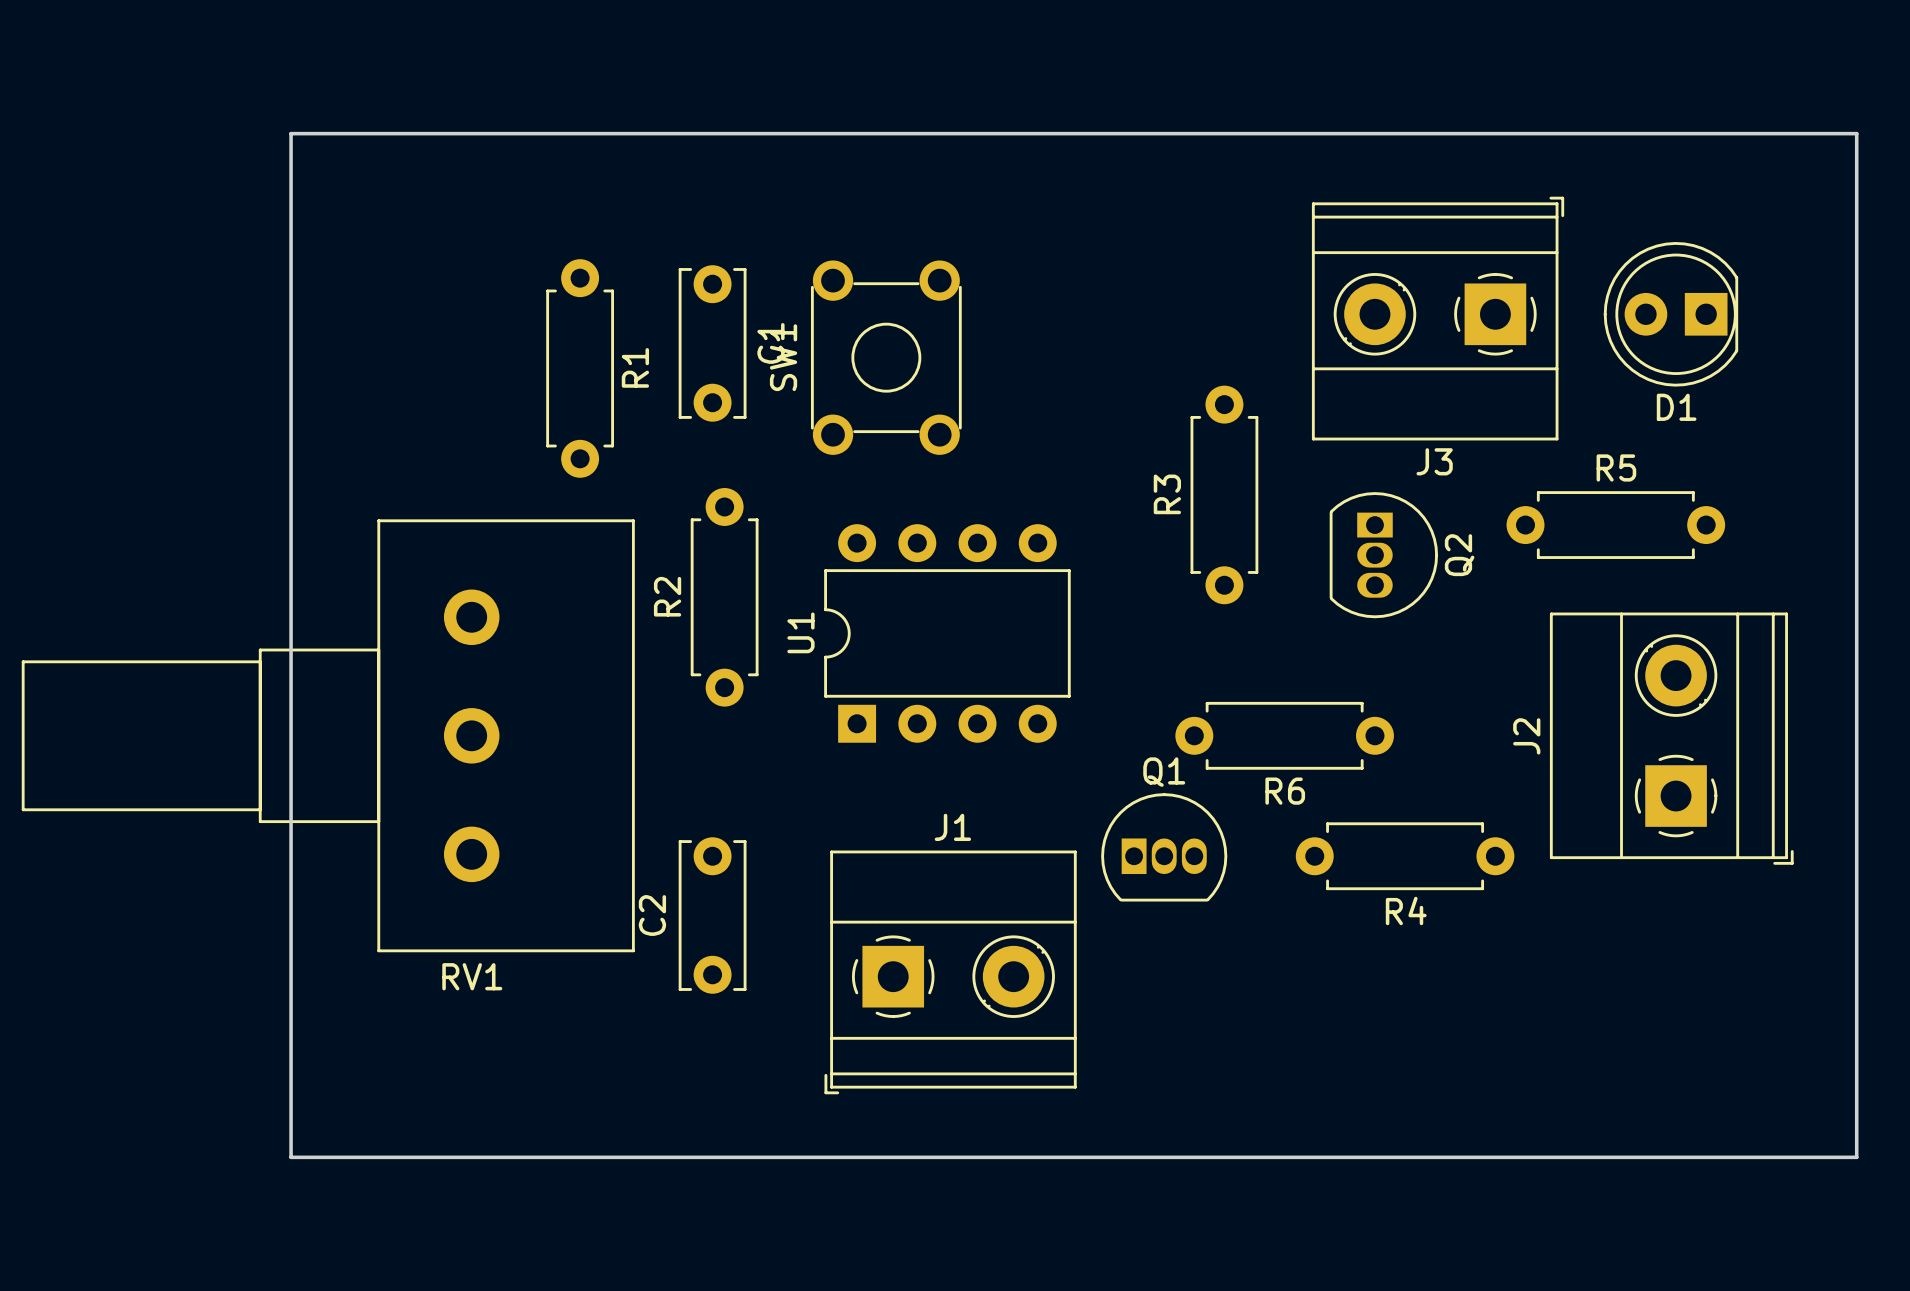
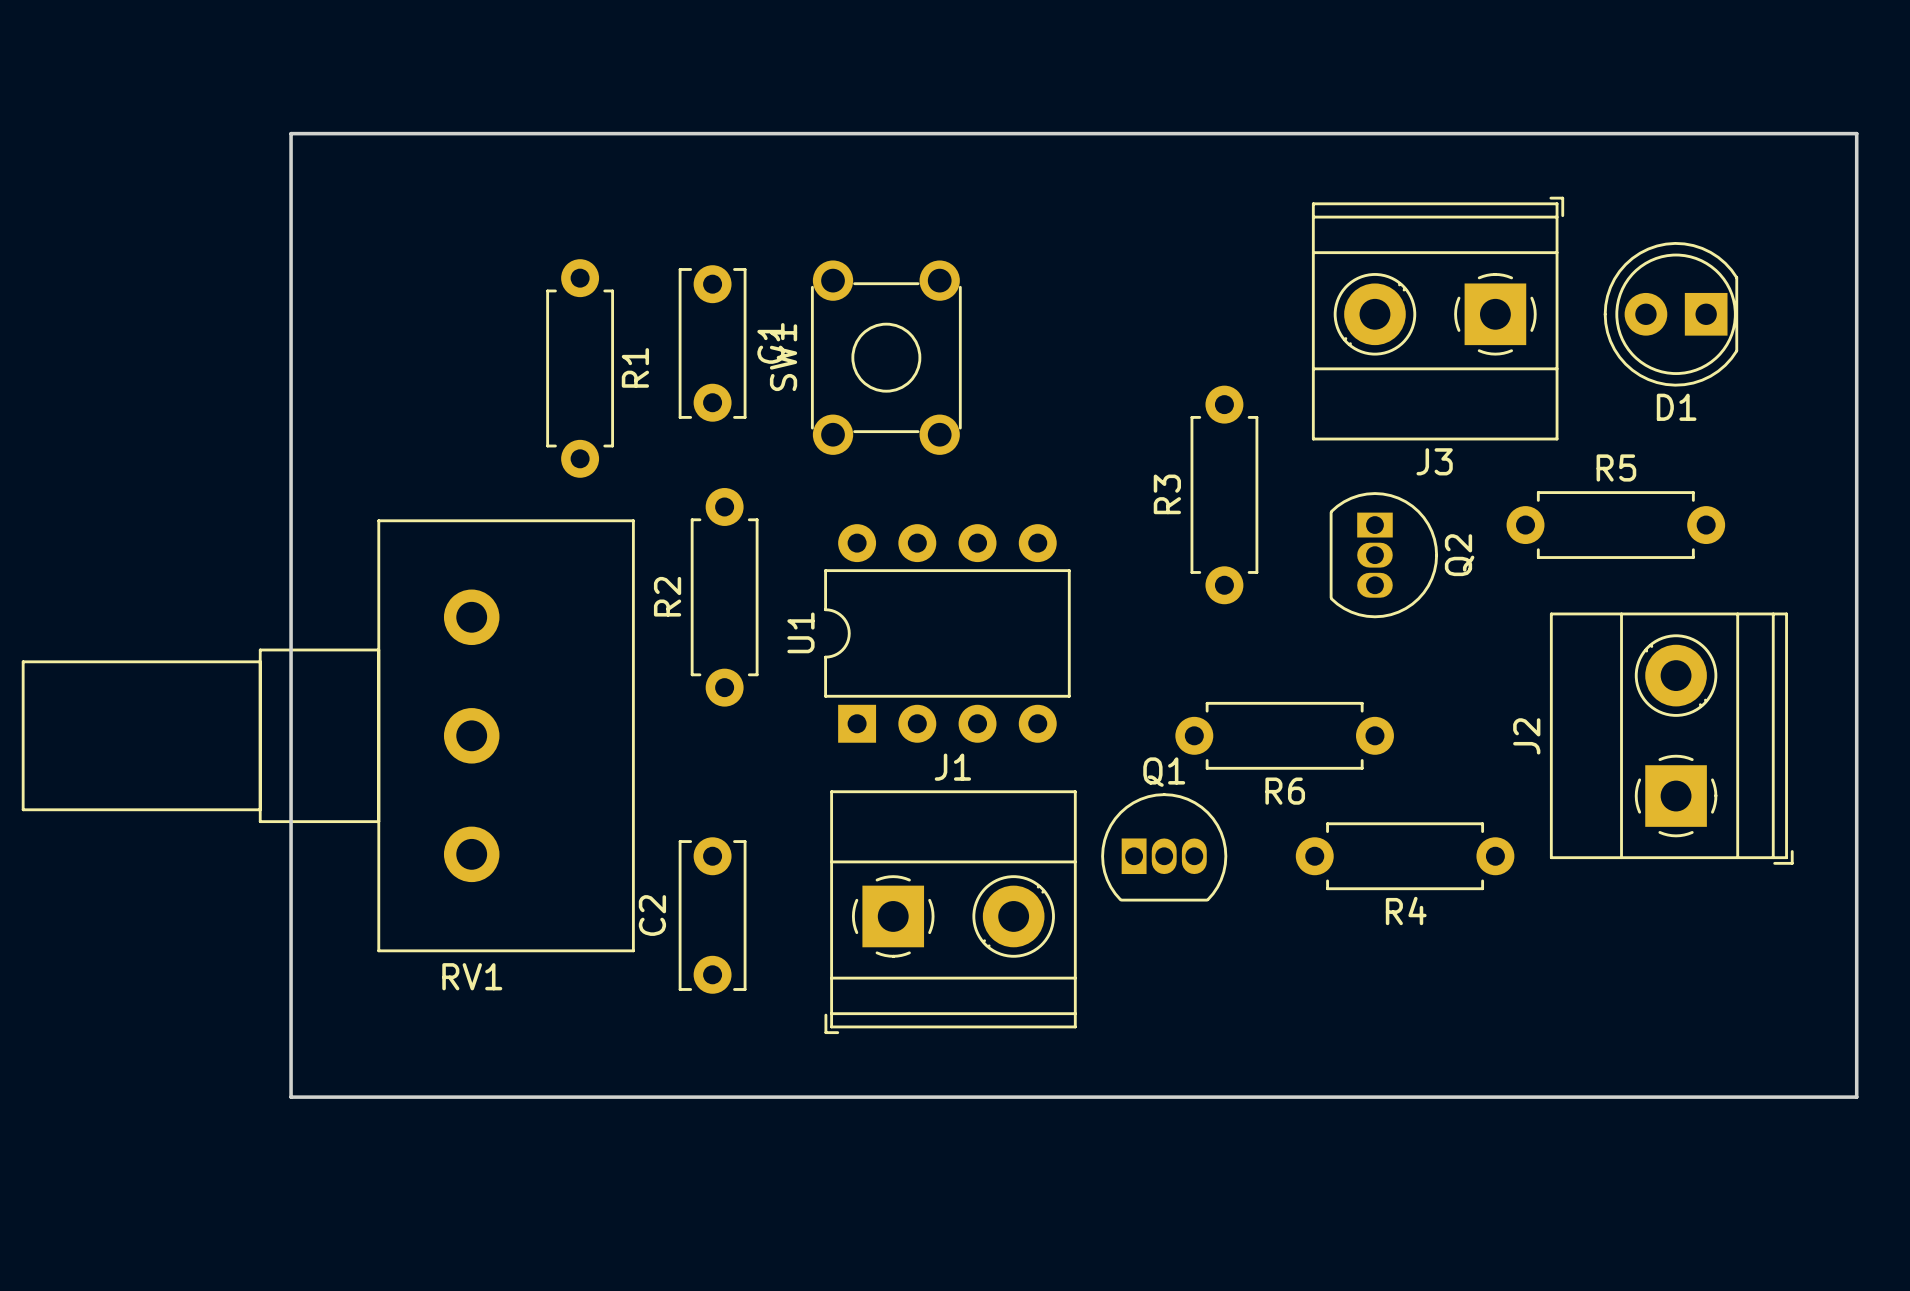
J1 position: (950, 972) -> (950, 912)
board edge: (291, 1097) (291, 1157) (1856, 1157) (1856, 1097) -> (291, 1097) (1856, 1097)

